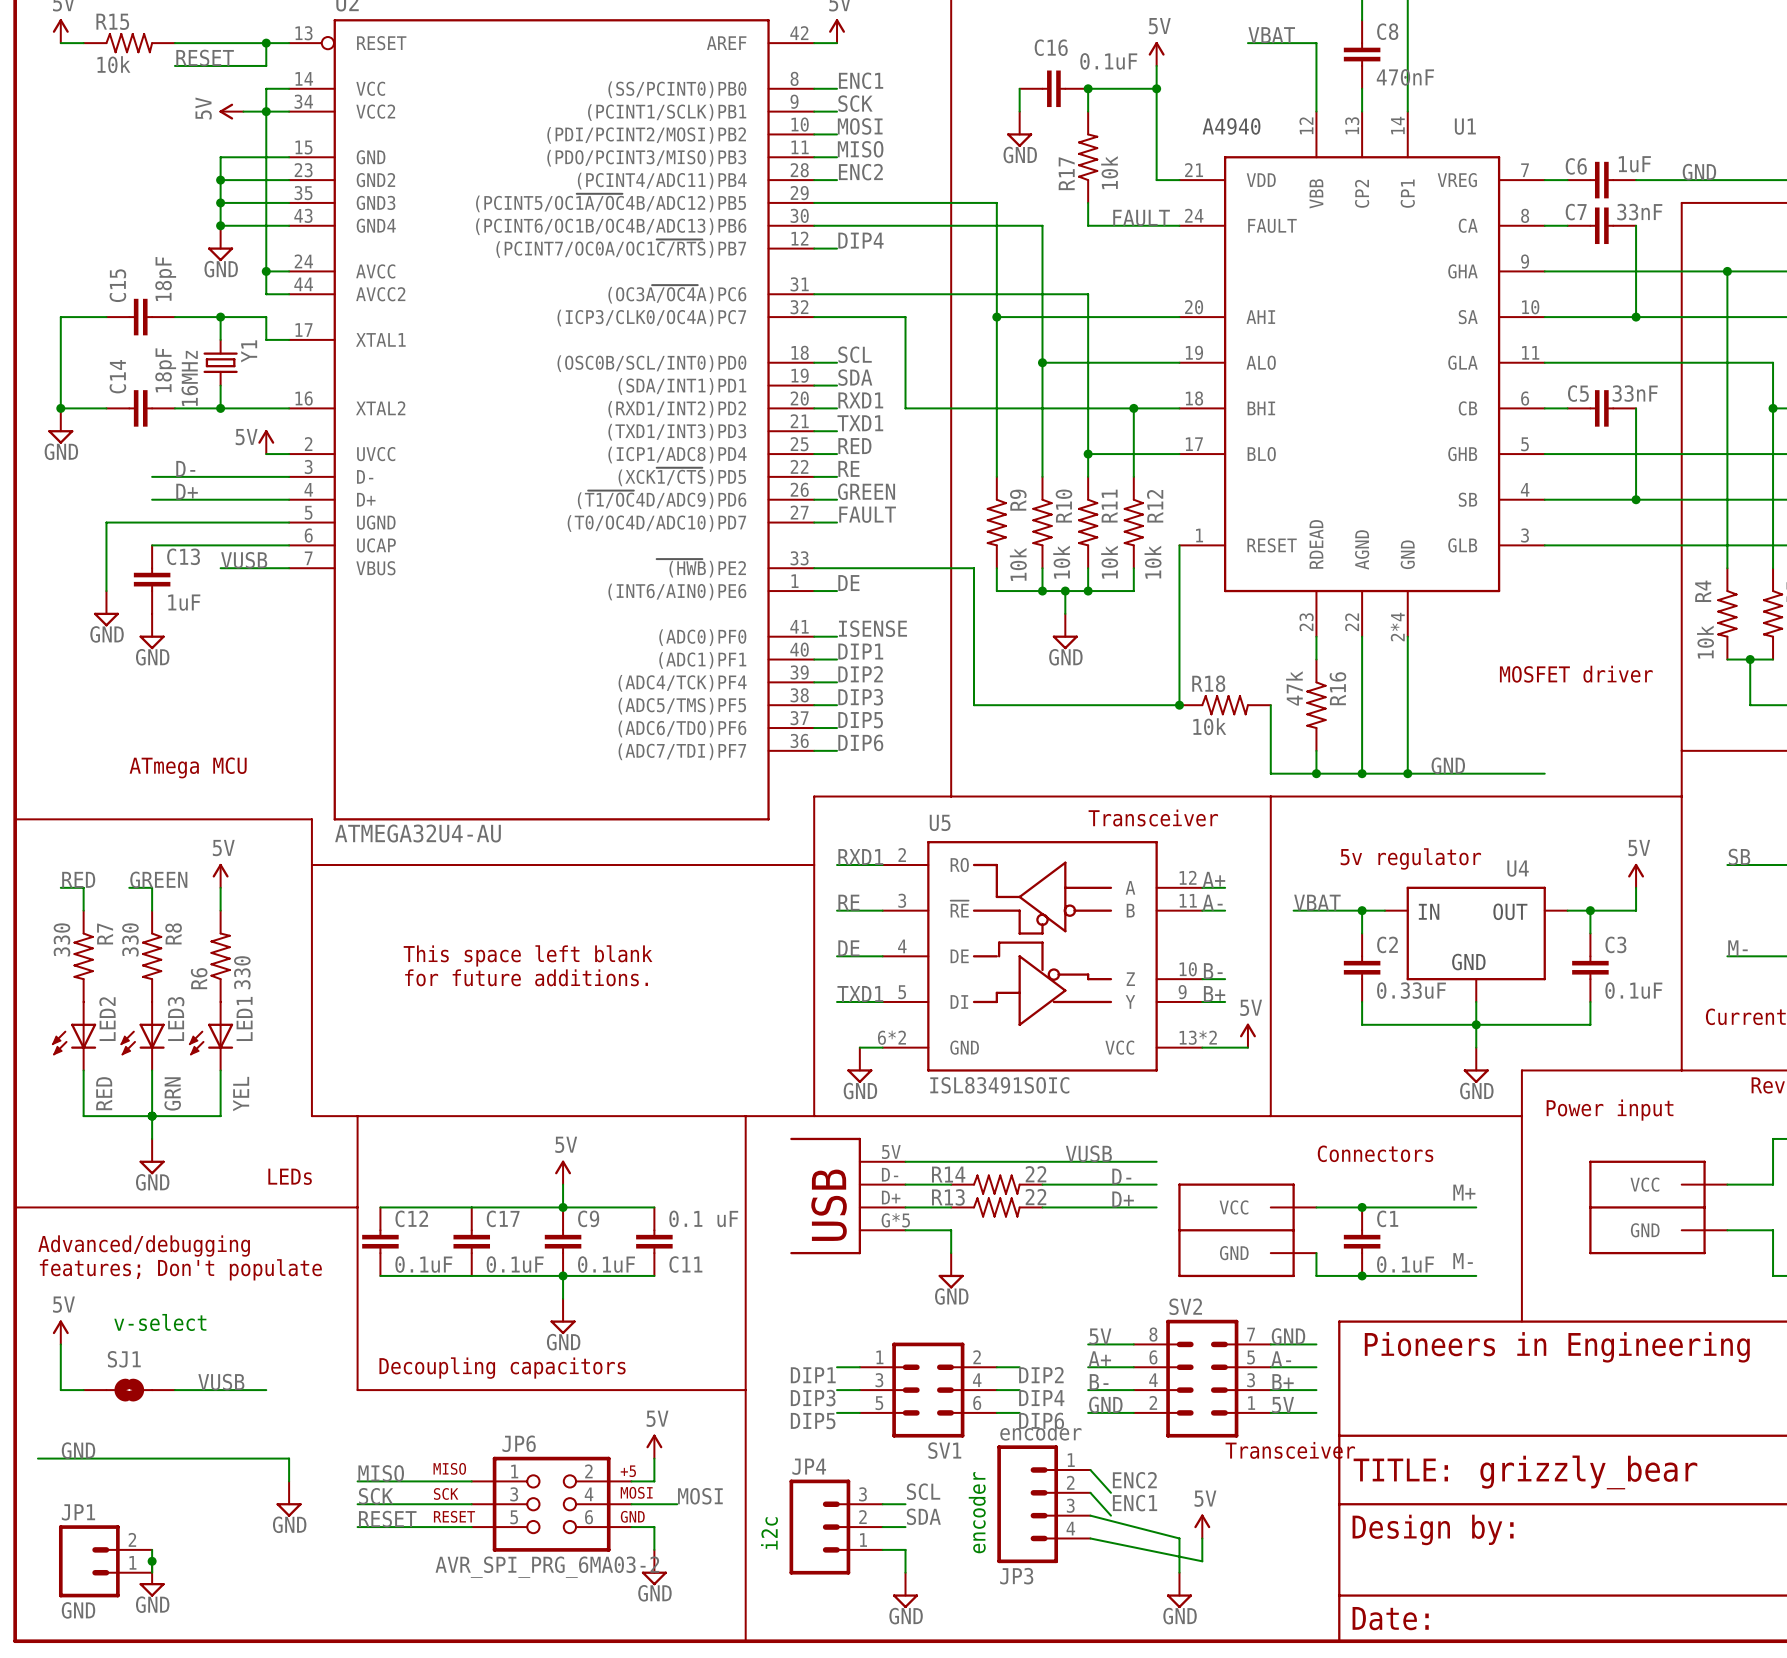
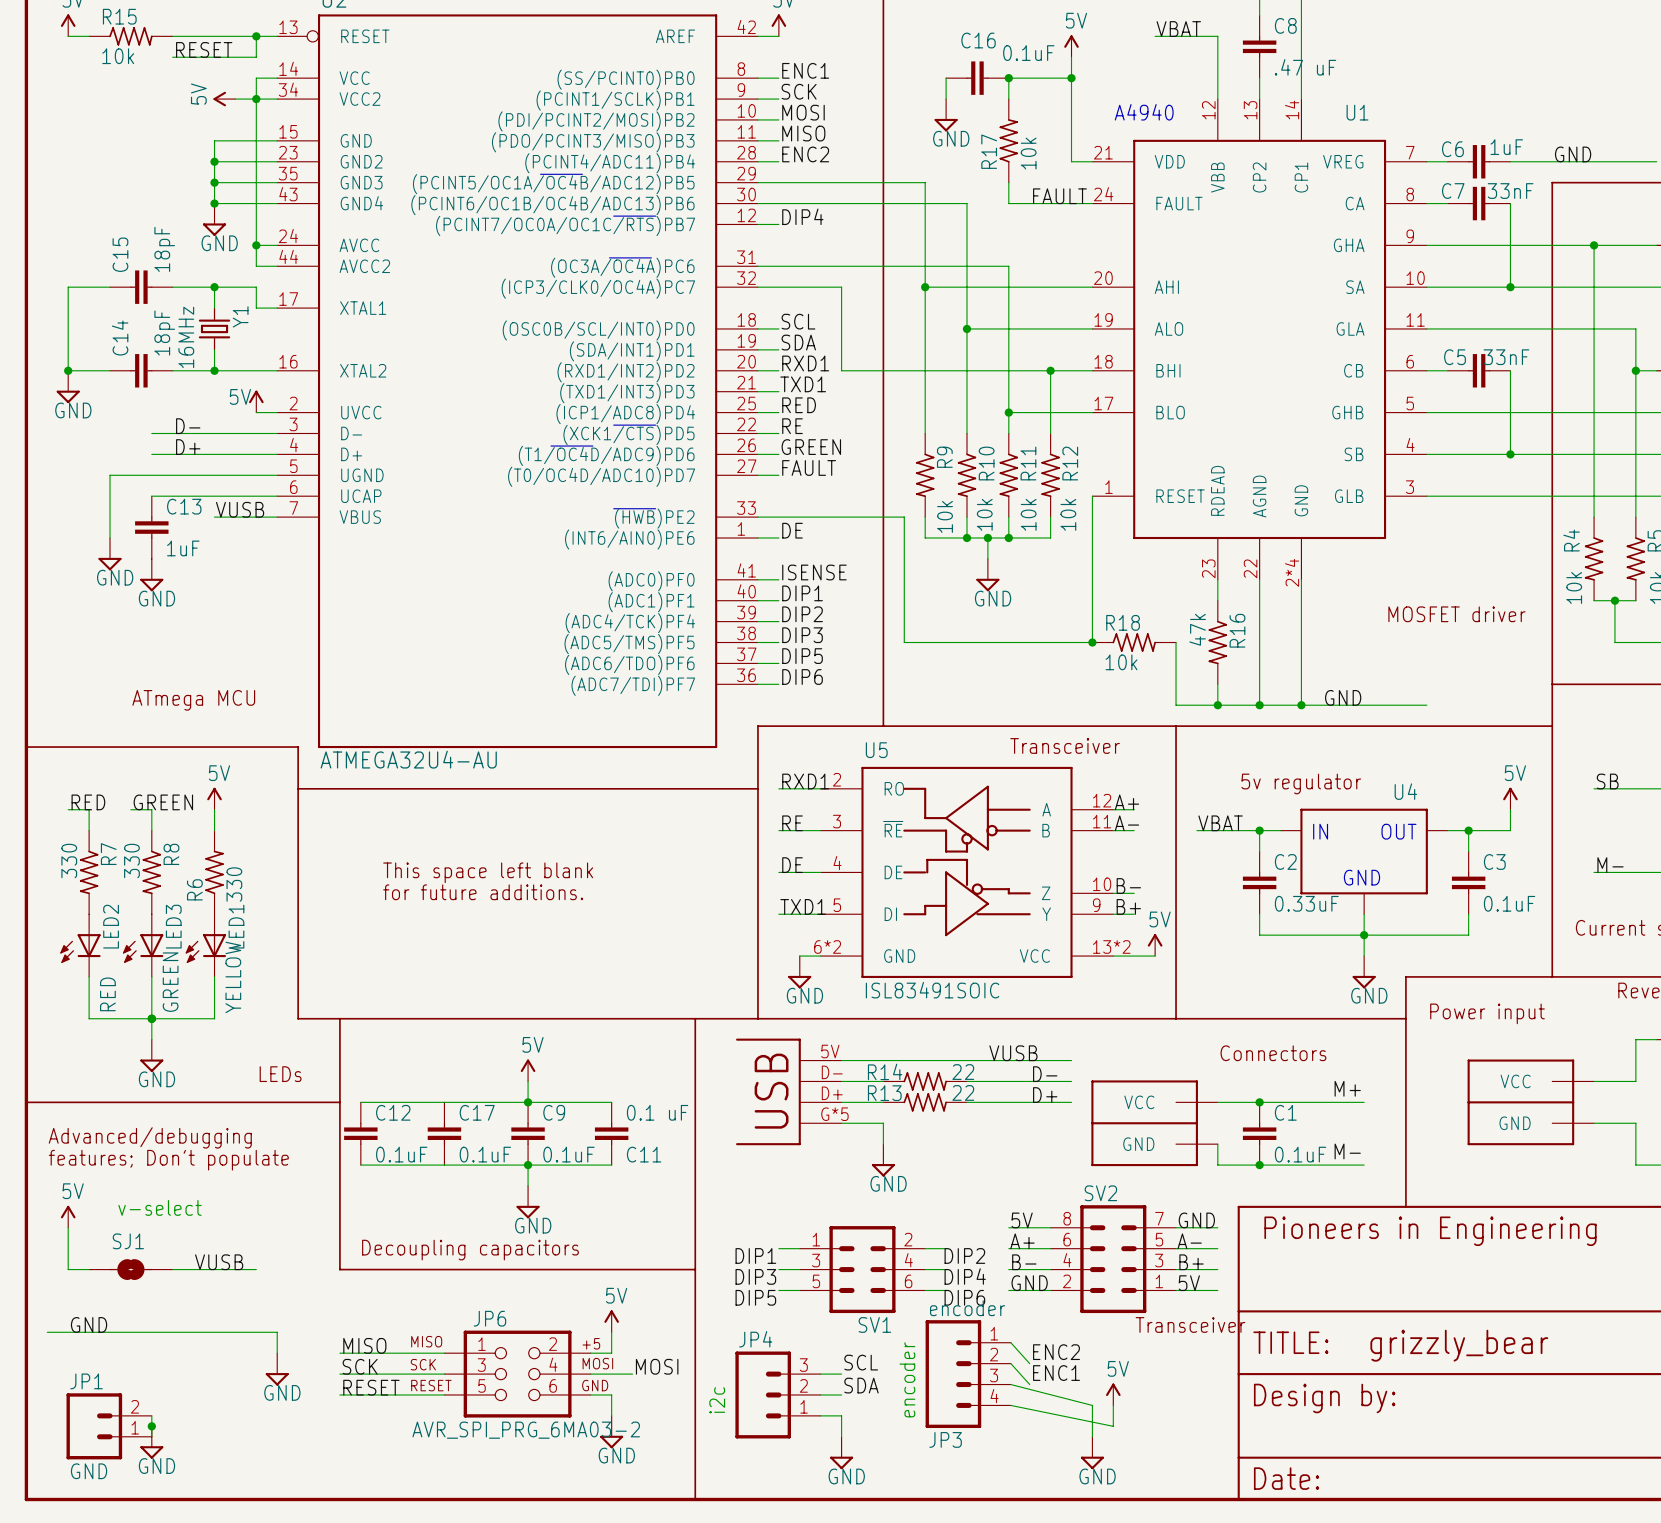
C8 value: 470nF (1405, 77) -> .47 uF (1305, 67)
LED3 value: GRN (172, 1093) -> GREEN (170, 982)
LED1 value: YEL (241, 1094) -> YELLOW (233, 977)

